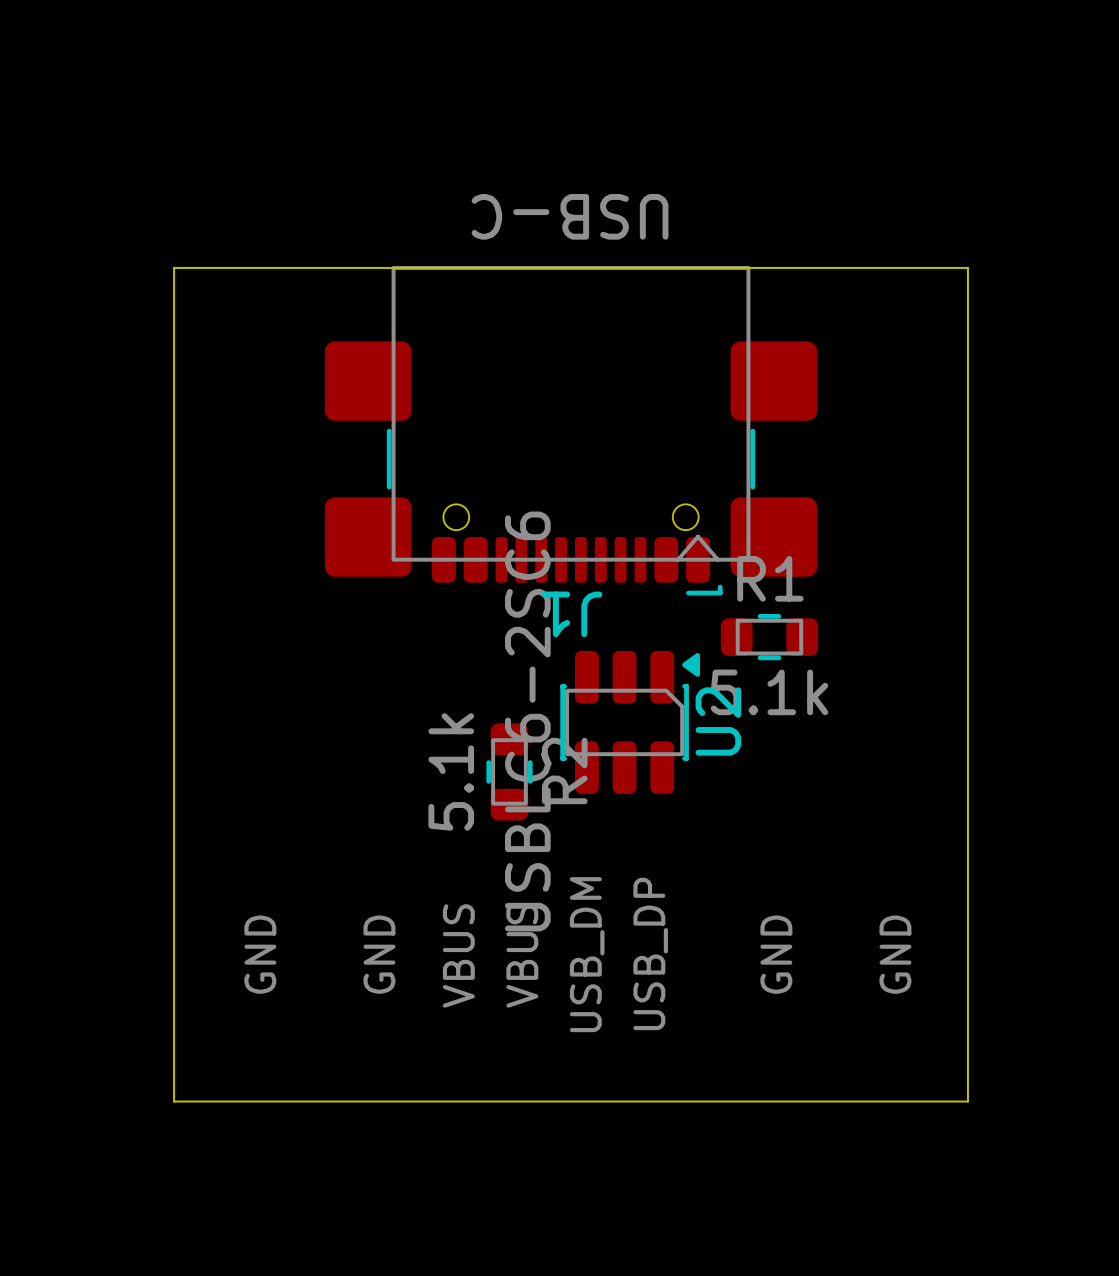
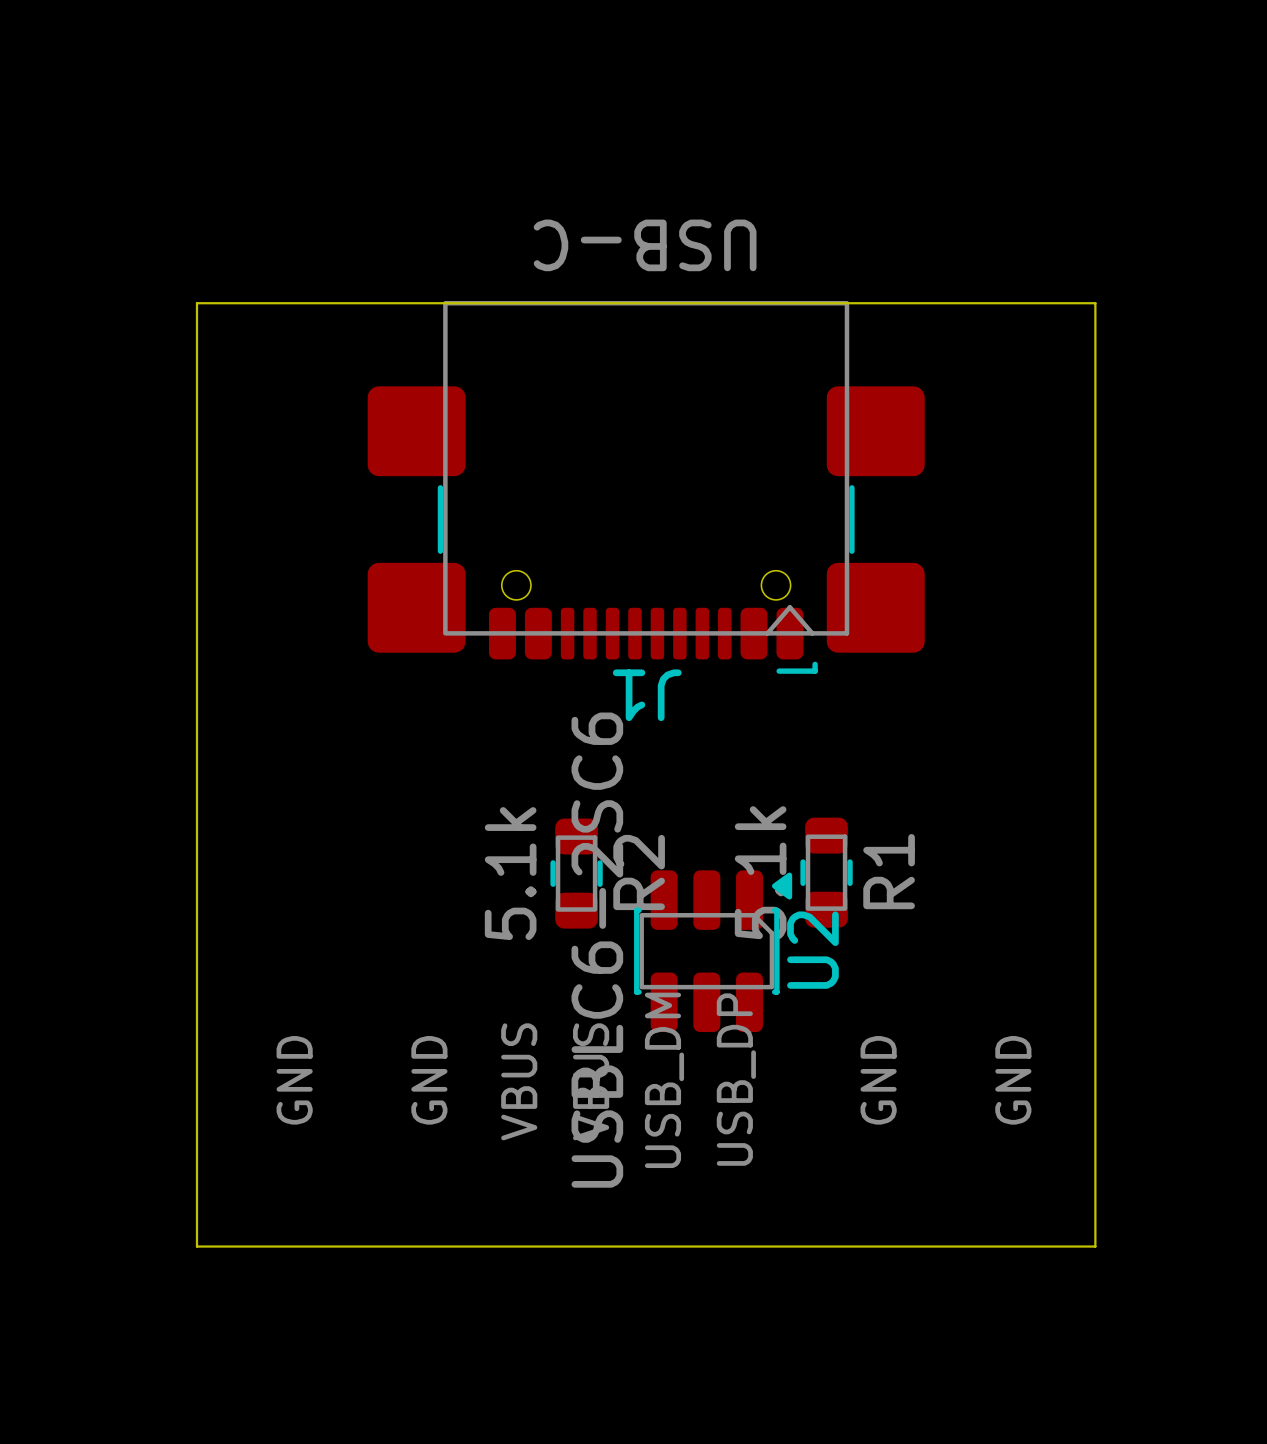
R1 rotation: 0° (769, 637) -> 90° clockwise (826, 872)
R1 position: (769, 637) -> (826, 872)
U2 position: (630, 722) -> (713, 951)

